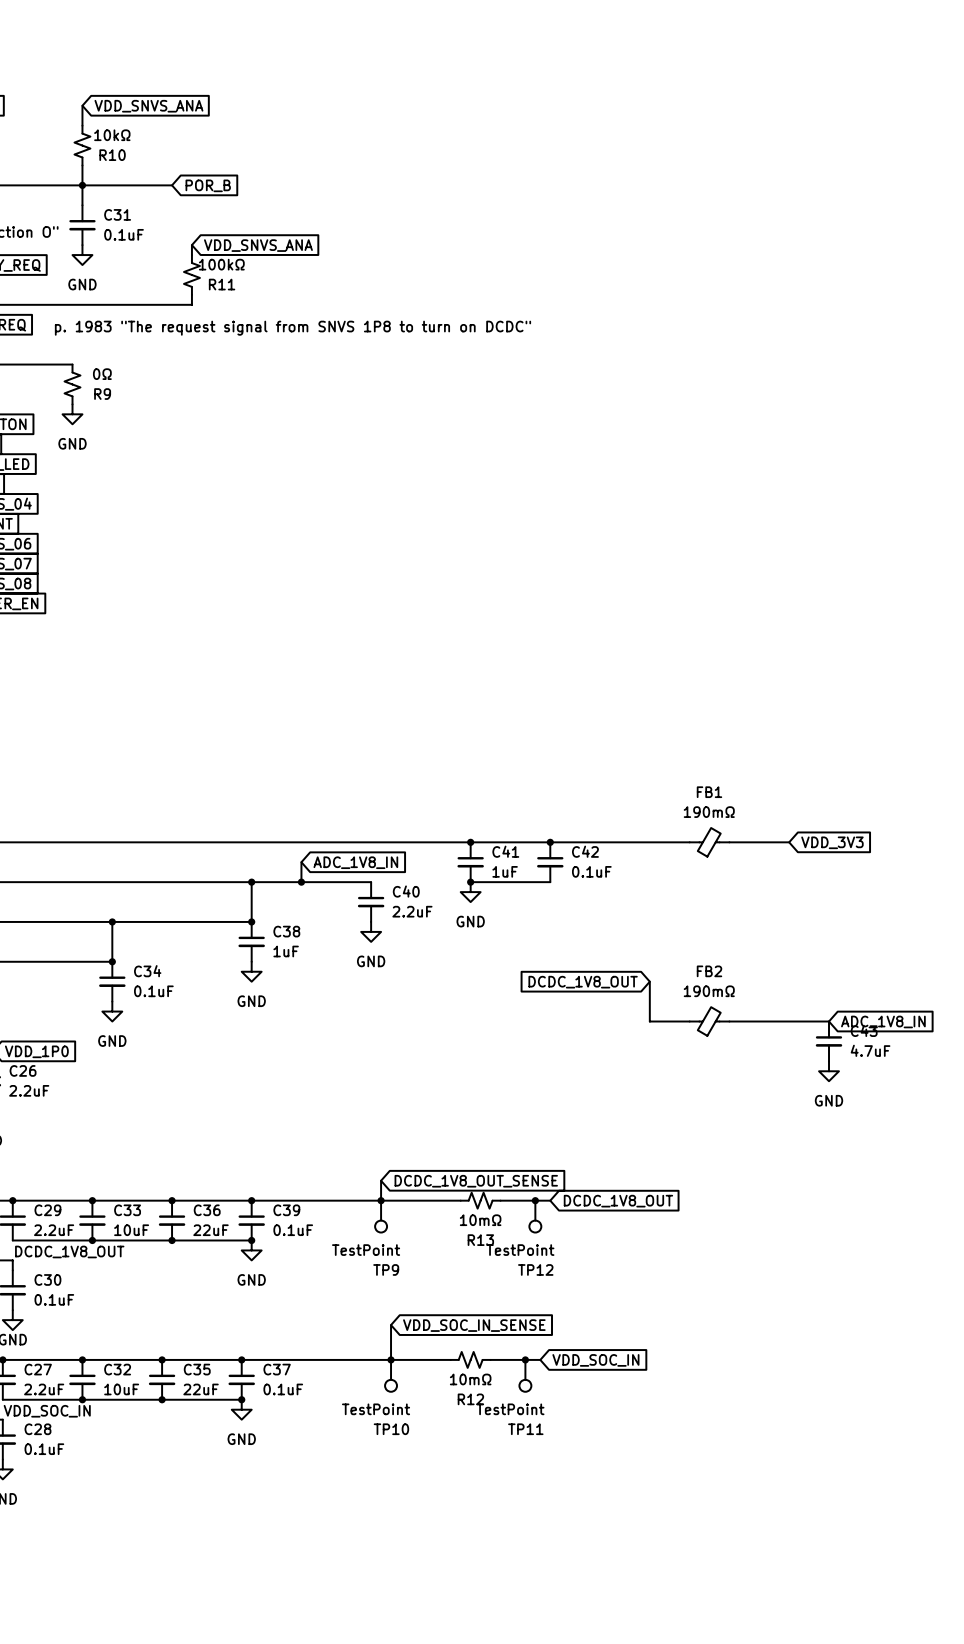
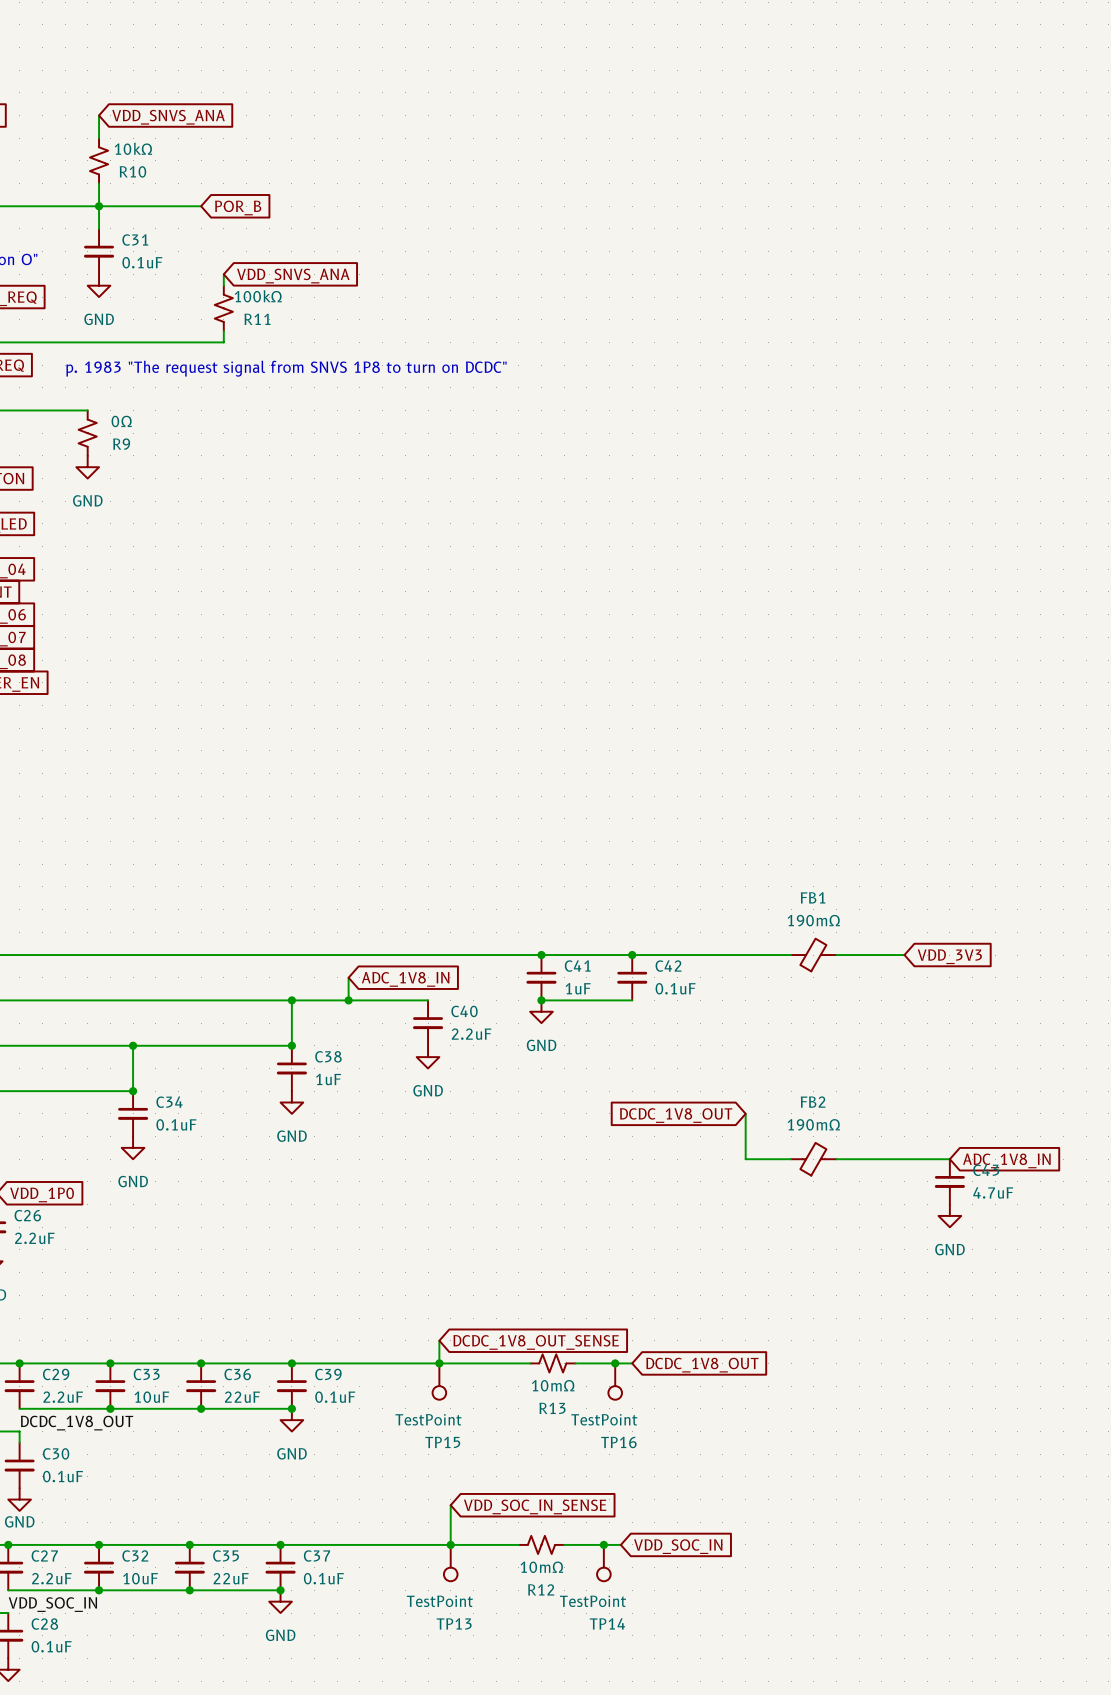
TP9 name: TP9 (386, 1269) -> TP15 (442, 1442)
TP12 name: TP12 (535, 1269) -> TP16 (618, 1442)
TP10 name: TP10 (391, 1429) -> TP13 (454, 1623)
TP11 name: TP11 (525, 1429) -> TP14 (607, 1623)

